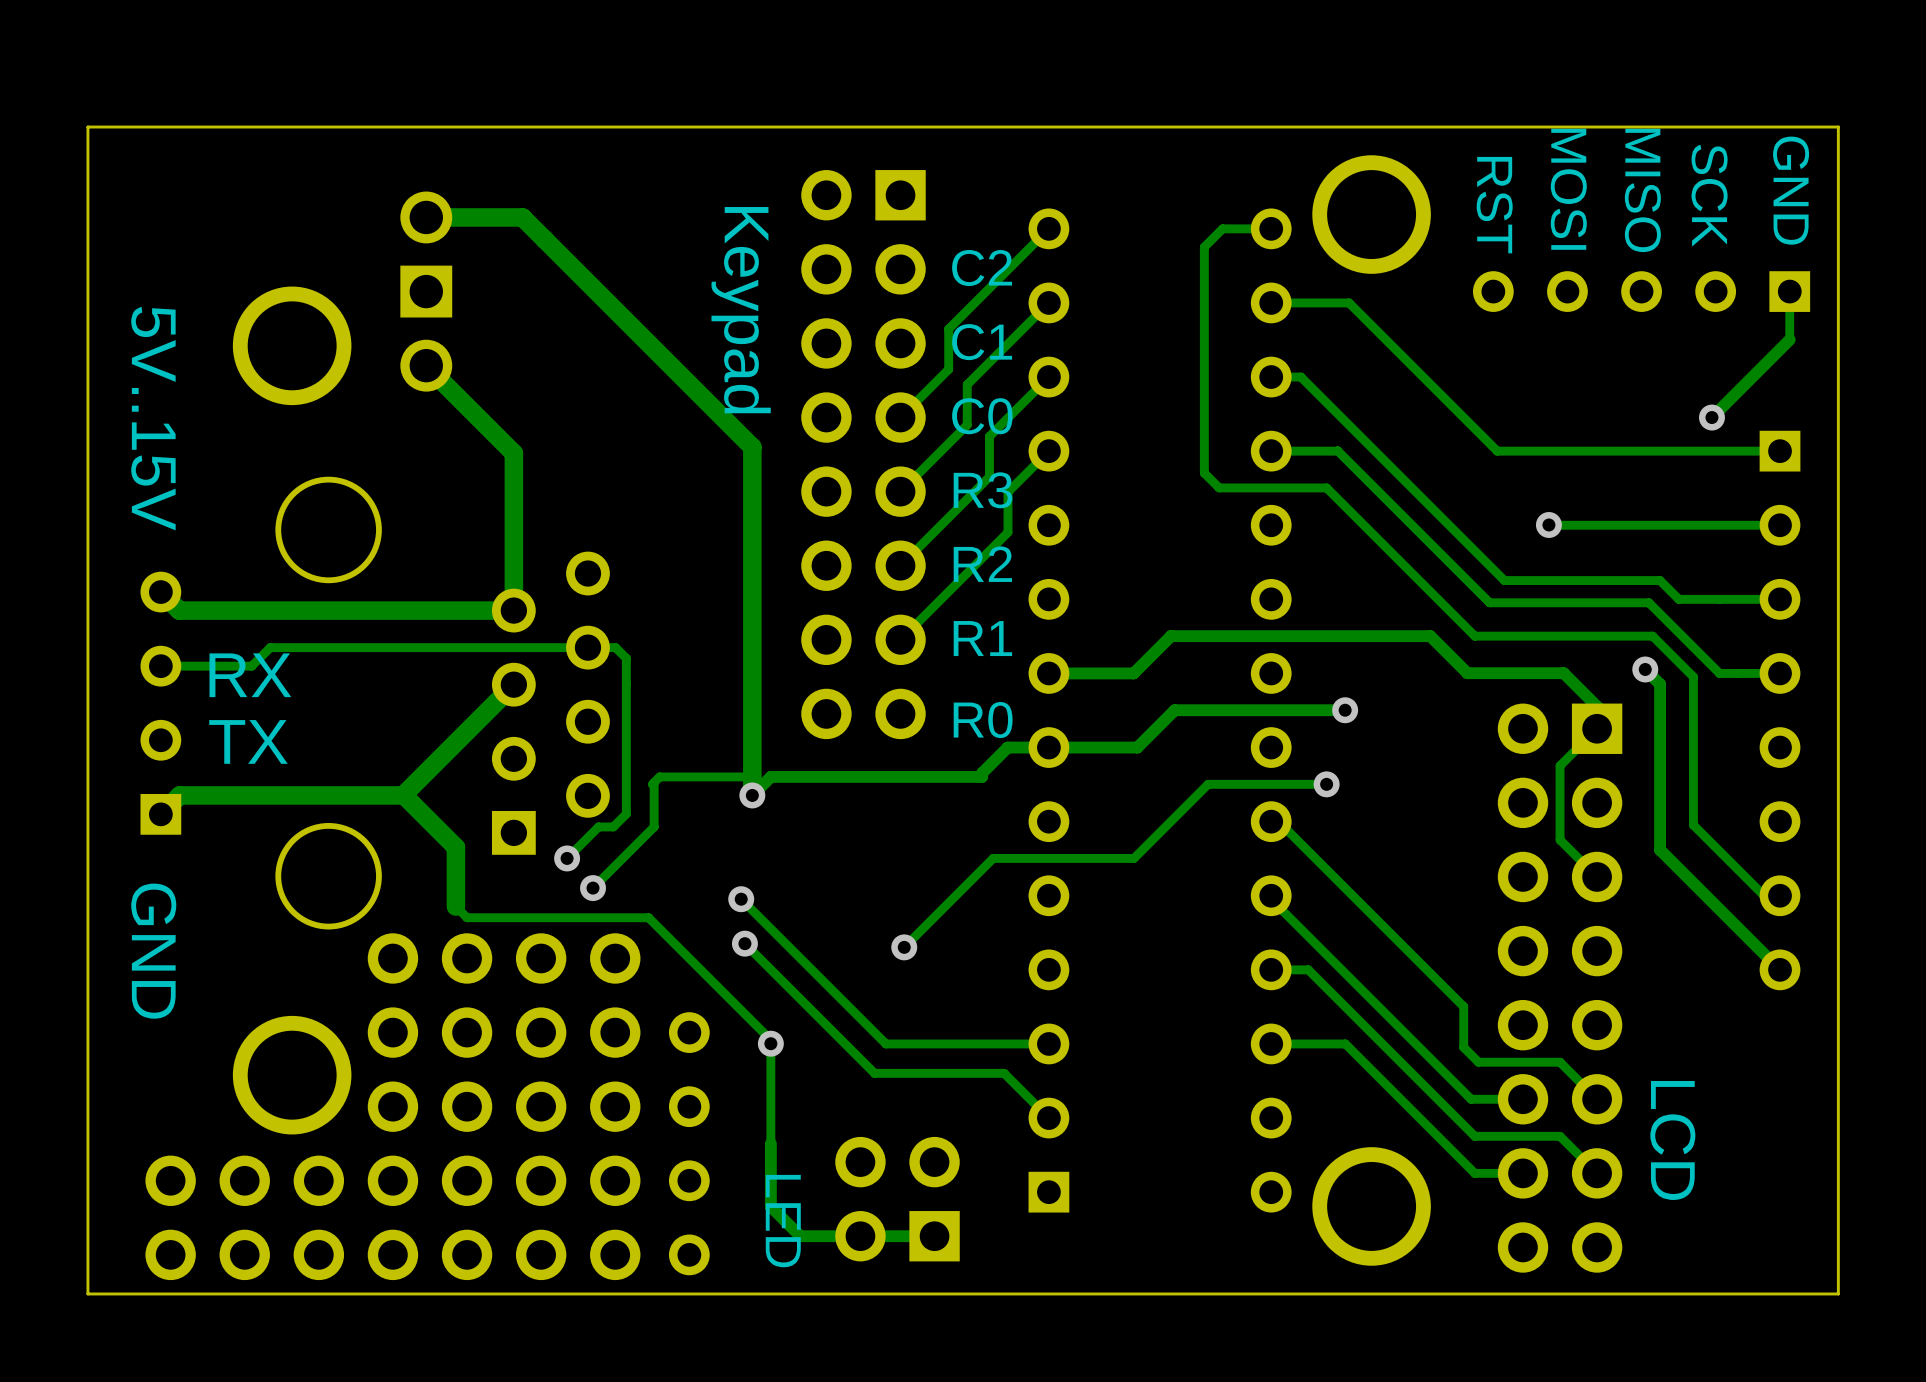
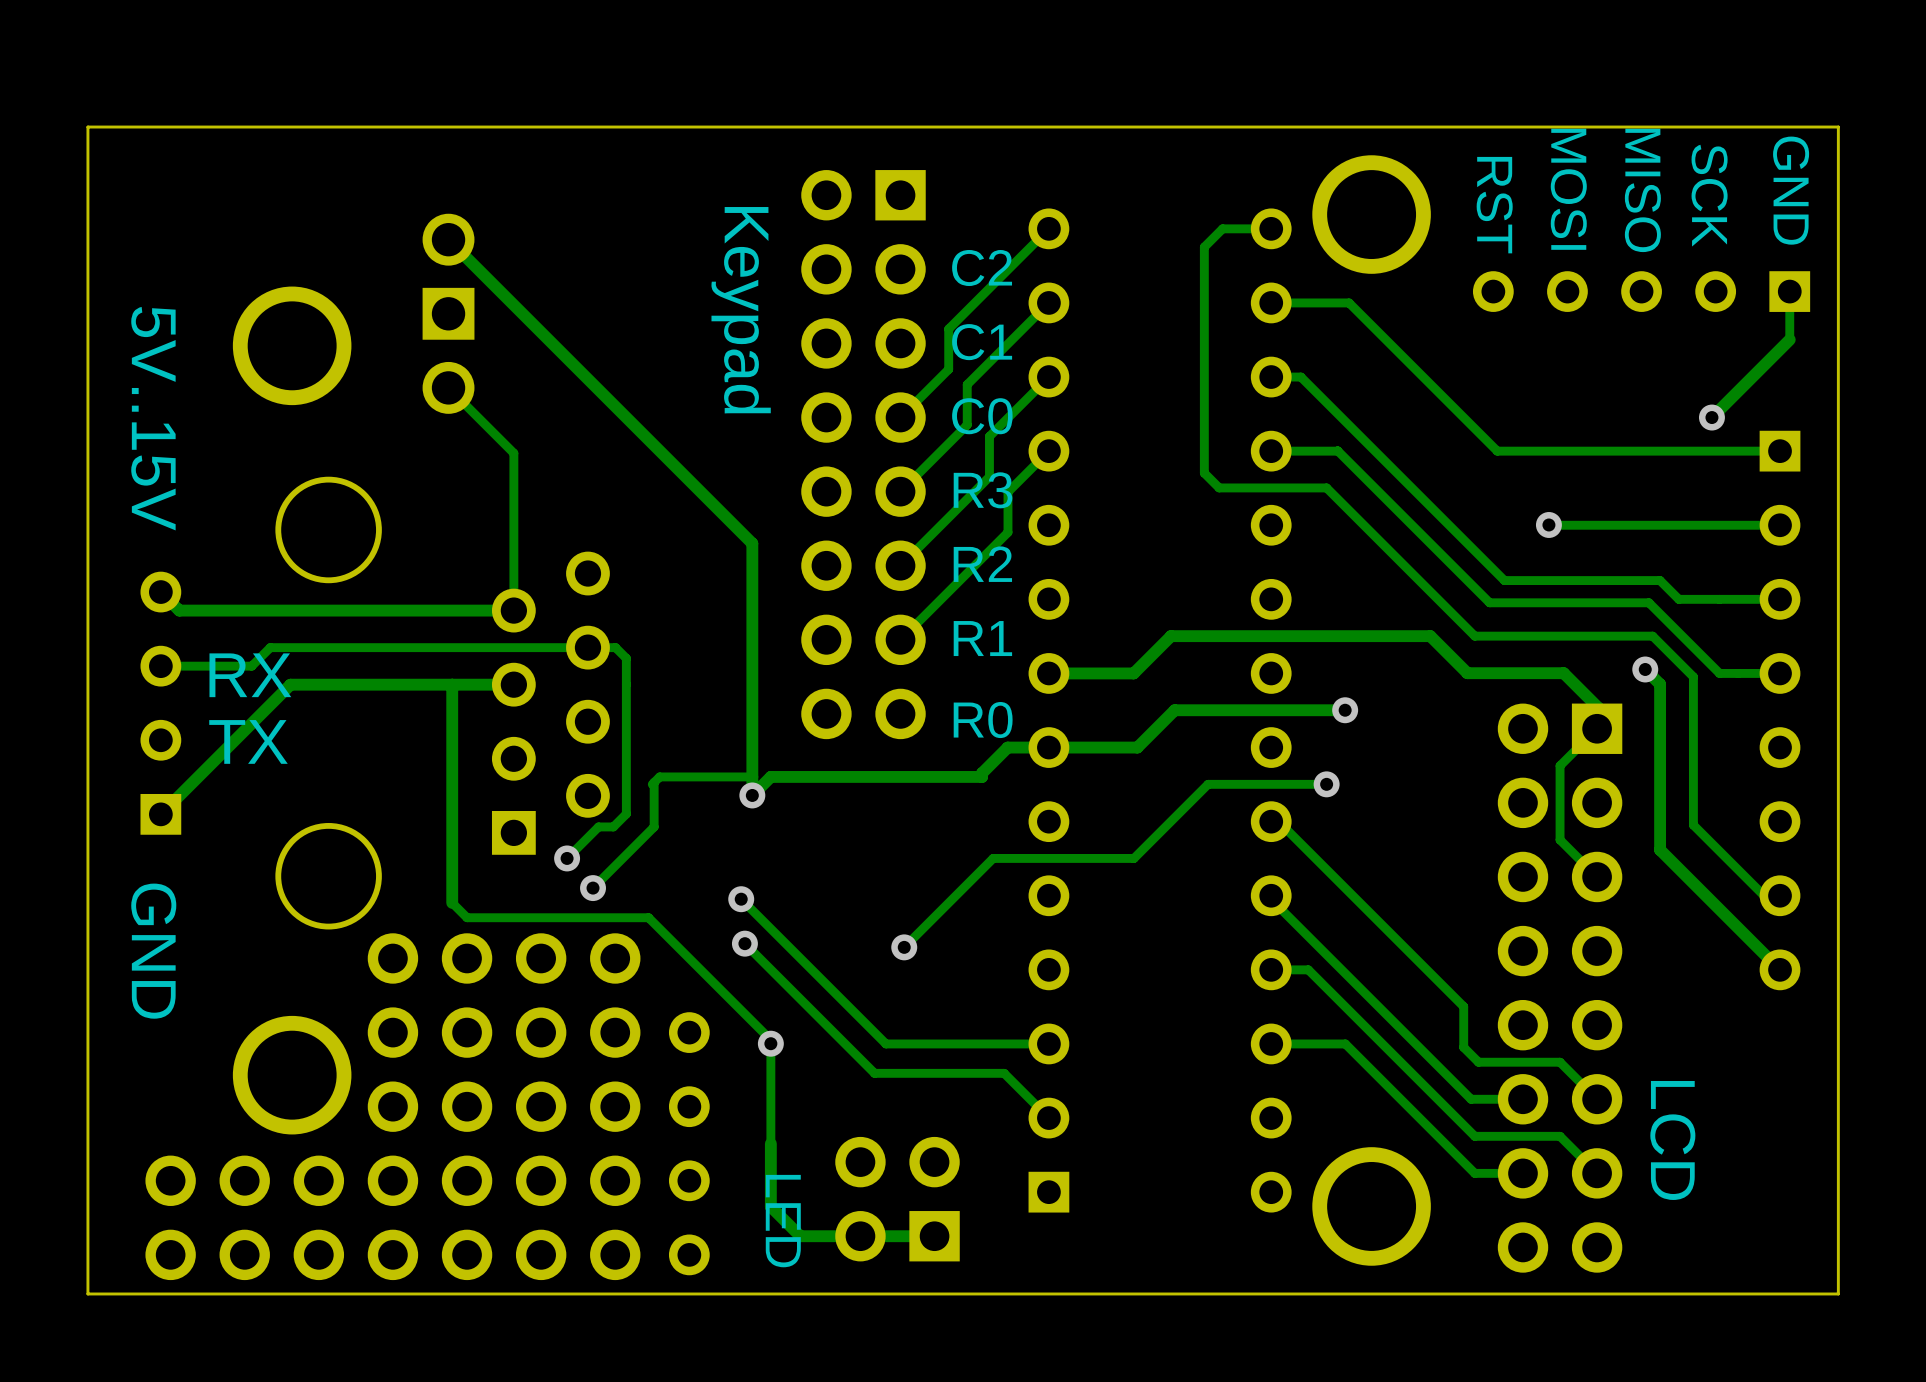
track: (426, 217) (522, 217) (752, 447) (752, 795) -> none
track: none -> (448, 239) (752, 543)
part position: (426, 291) -> (448, 313)
track width: thick (448, 387) (513, 453) (513, 610) (179, 610) (160, 592) -> thin (448, 387) (513, 453) (513, 610) (179, 610) (160, 592)
track: none -> (452, 684) (452, 902)
track: (513, 684) (403, 795) (179, 795) -> (513, 684) (290, 684) (179, 795)
track: (403, 794) (455, 847) (455, 906) -> none

